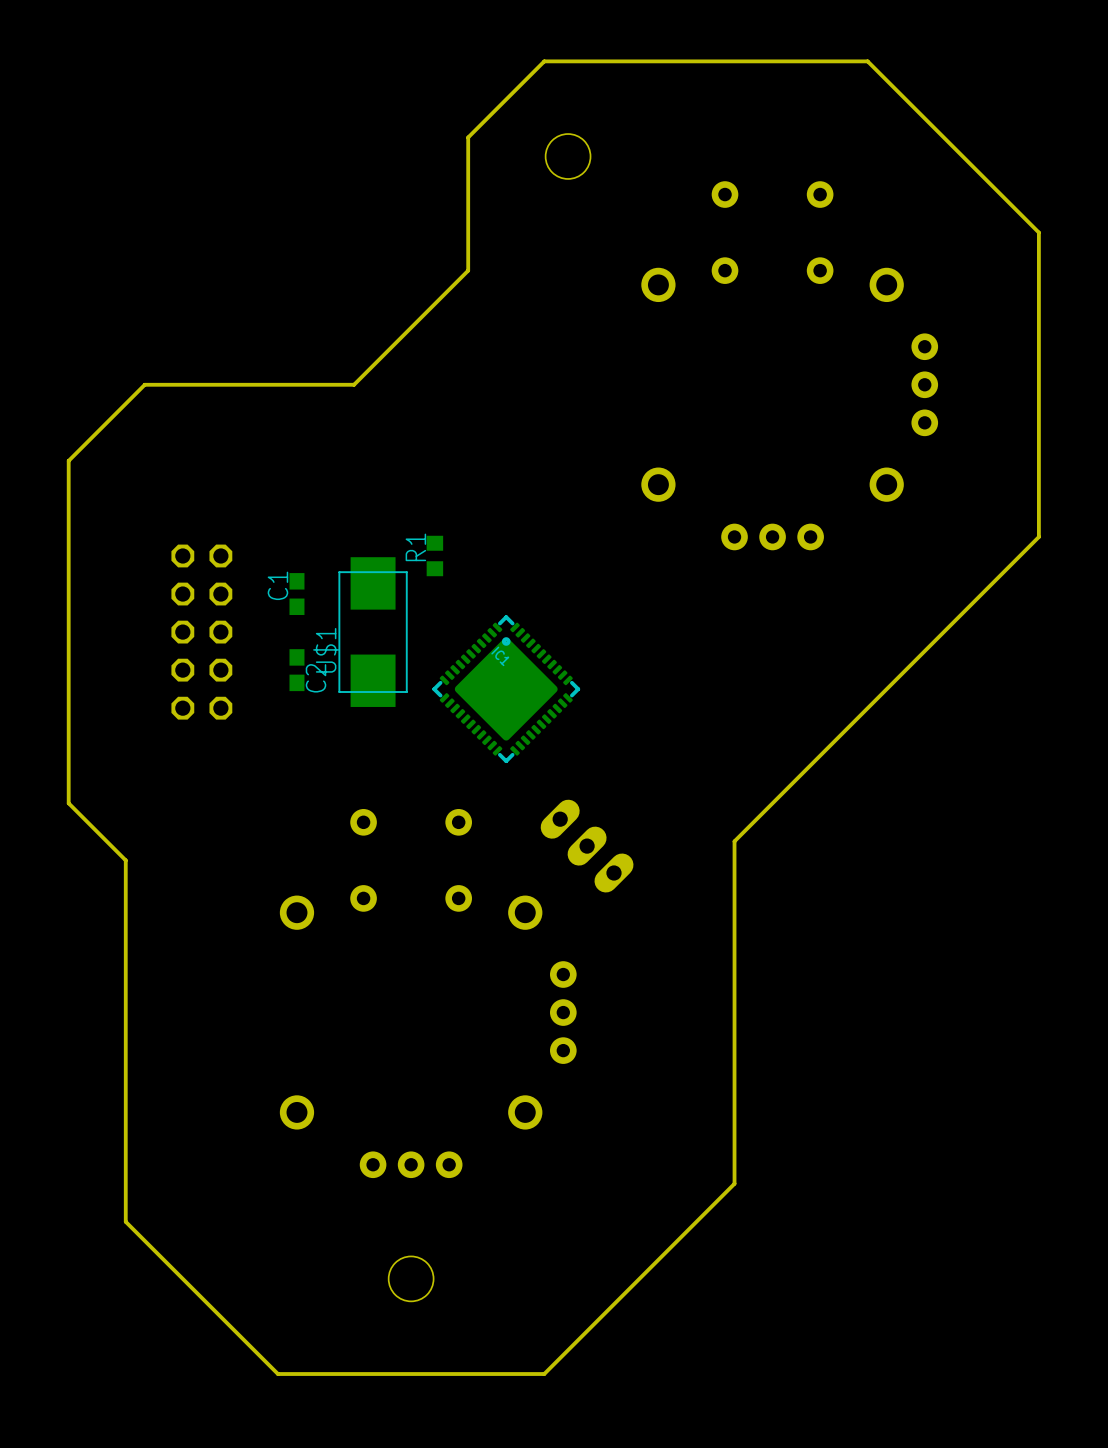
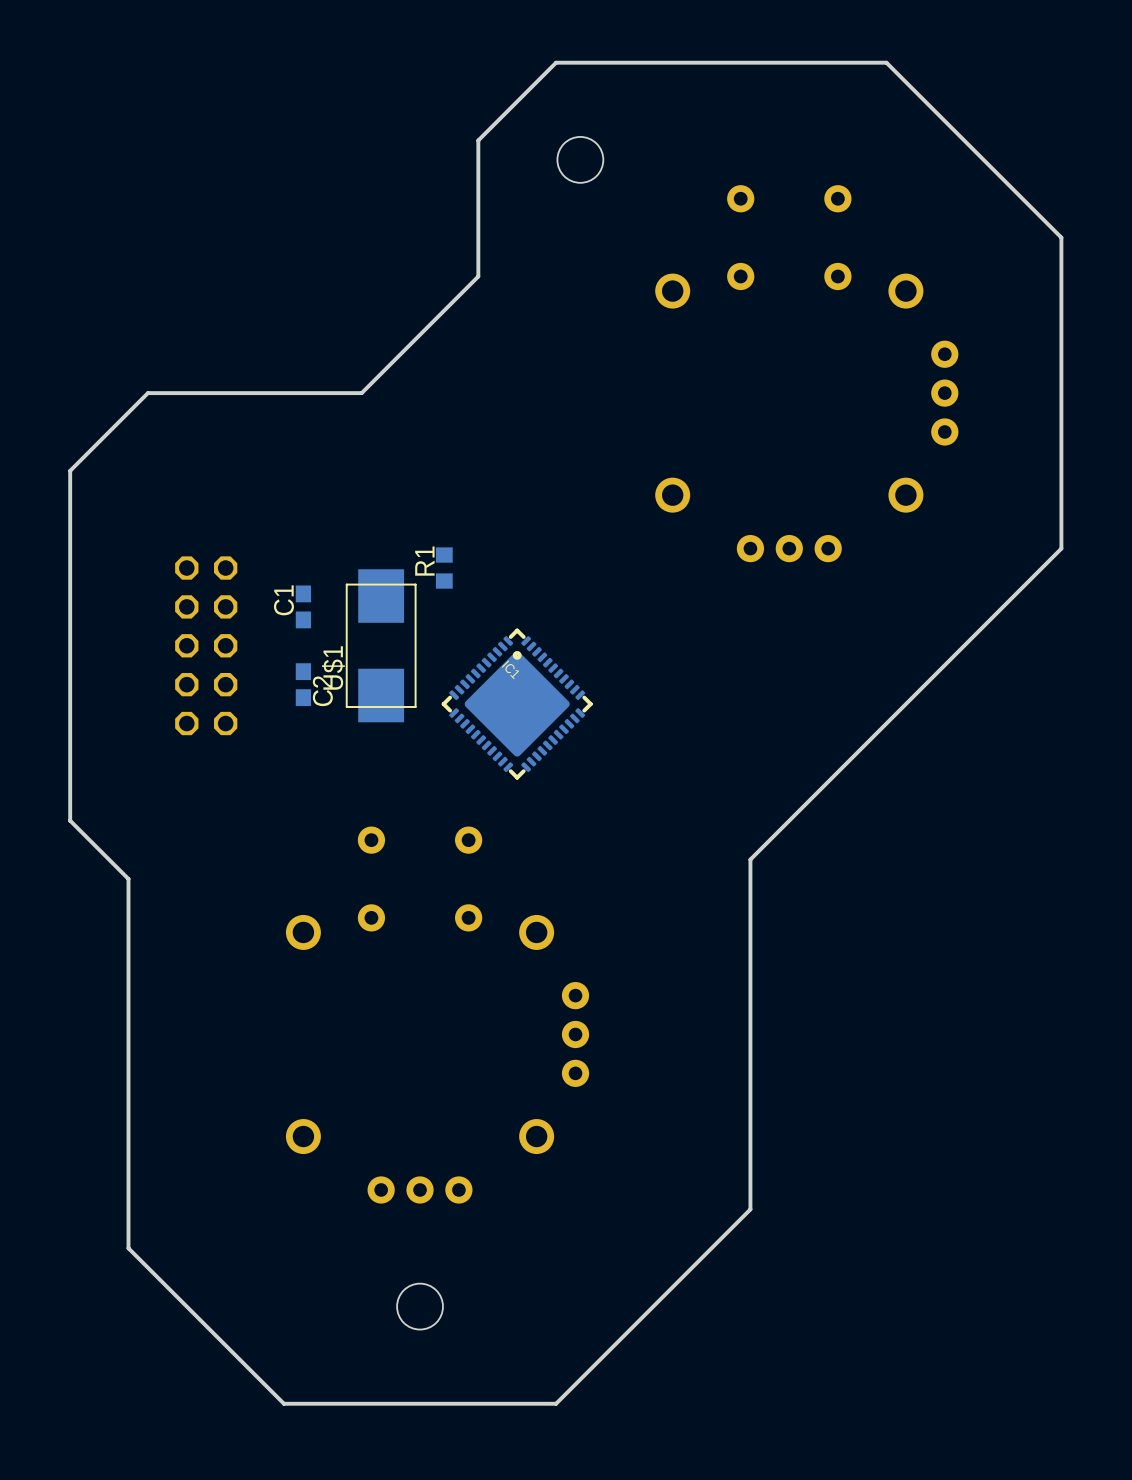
part: (587, 846) -> none

